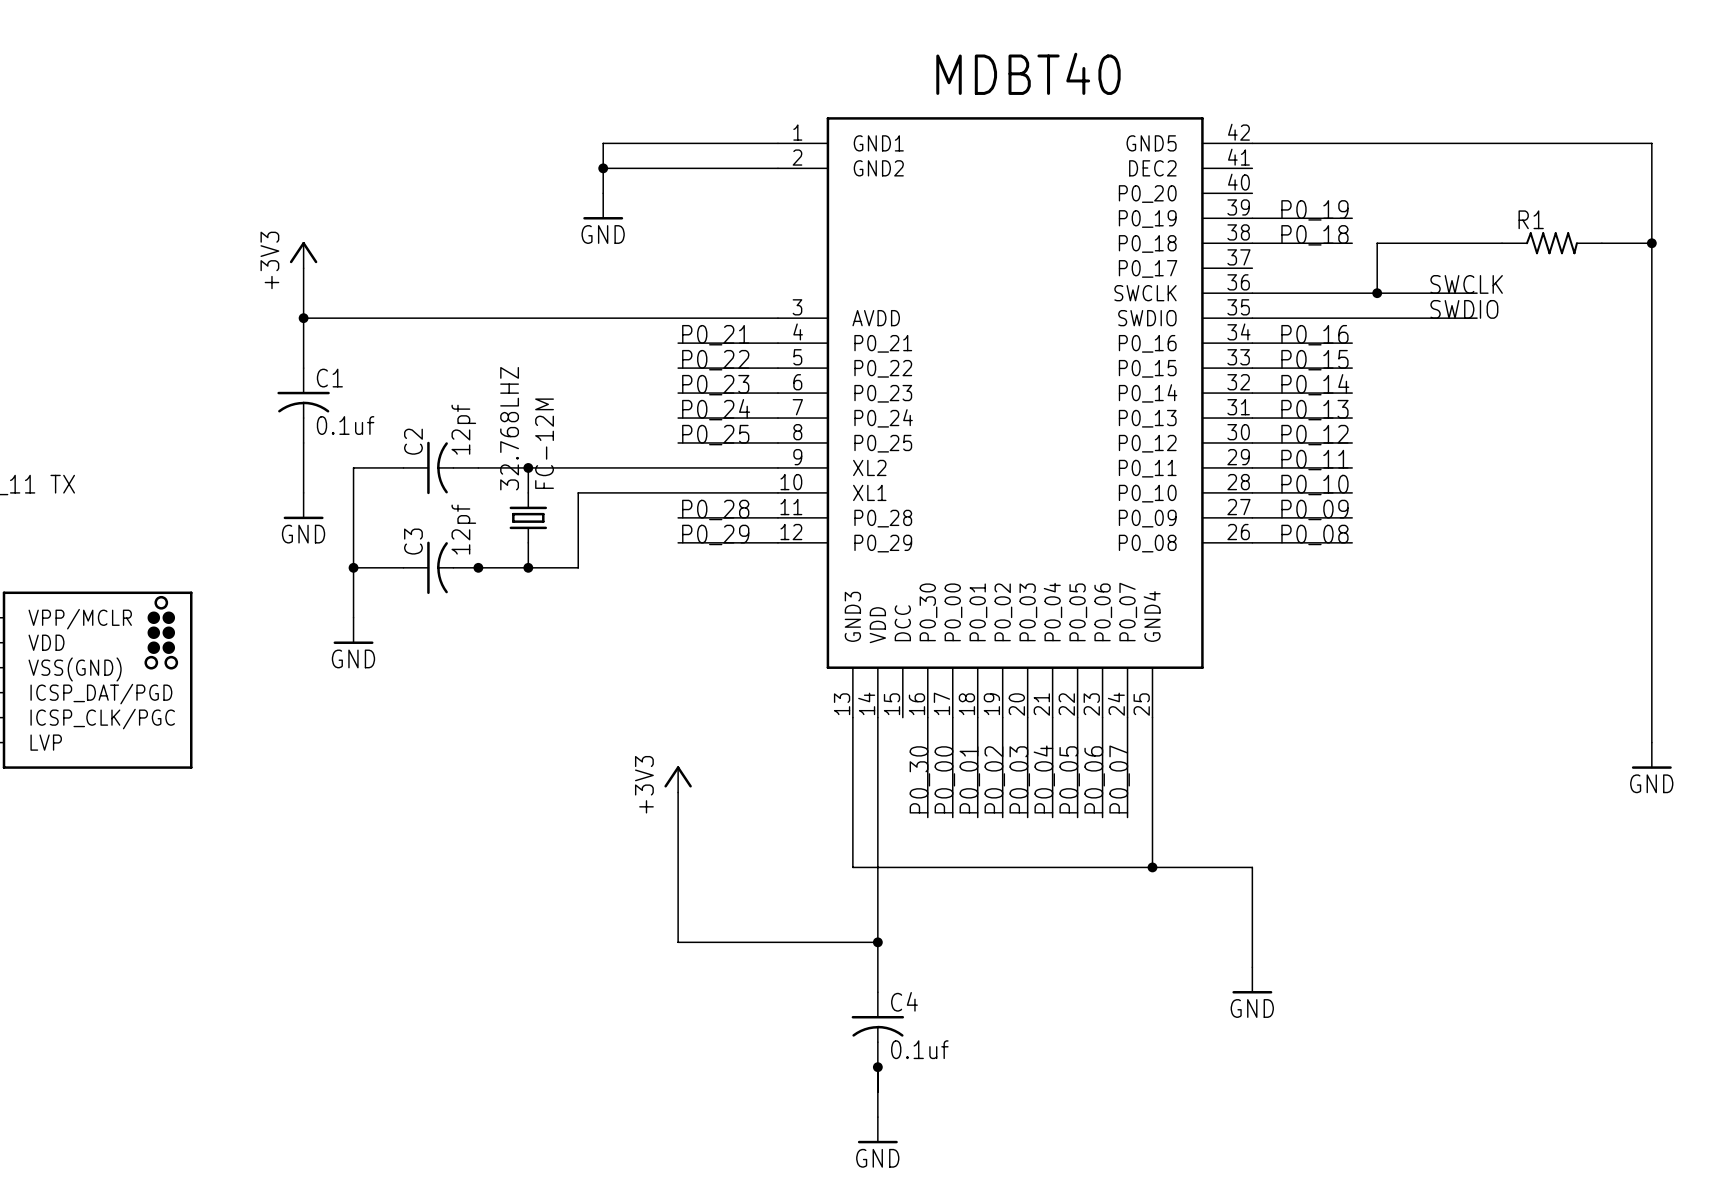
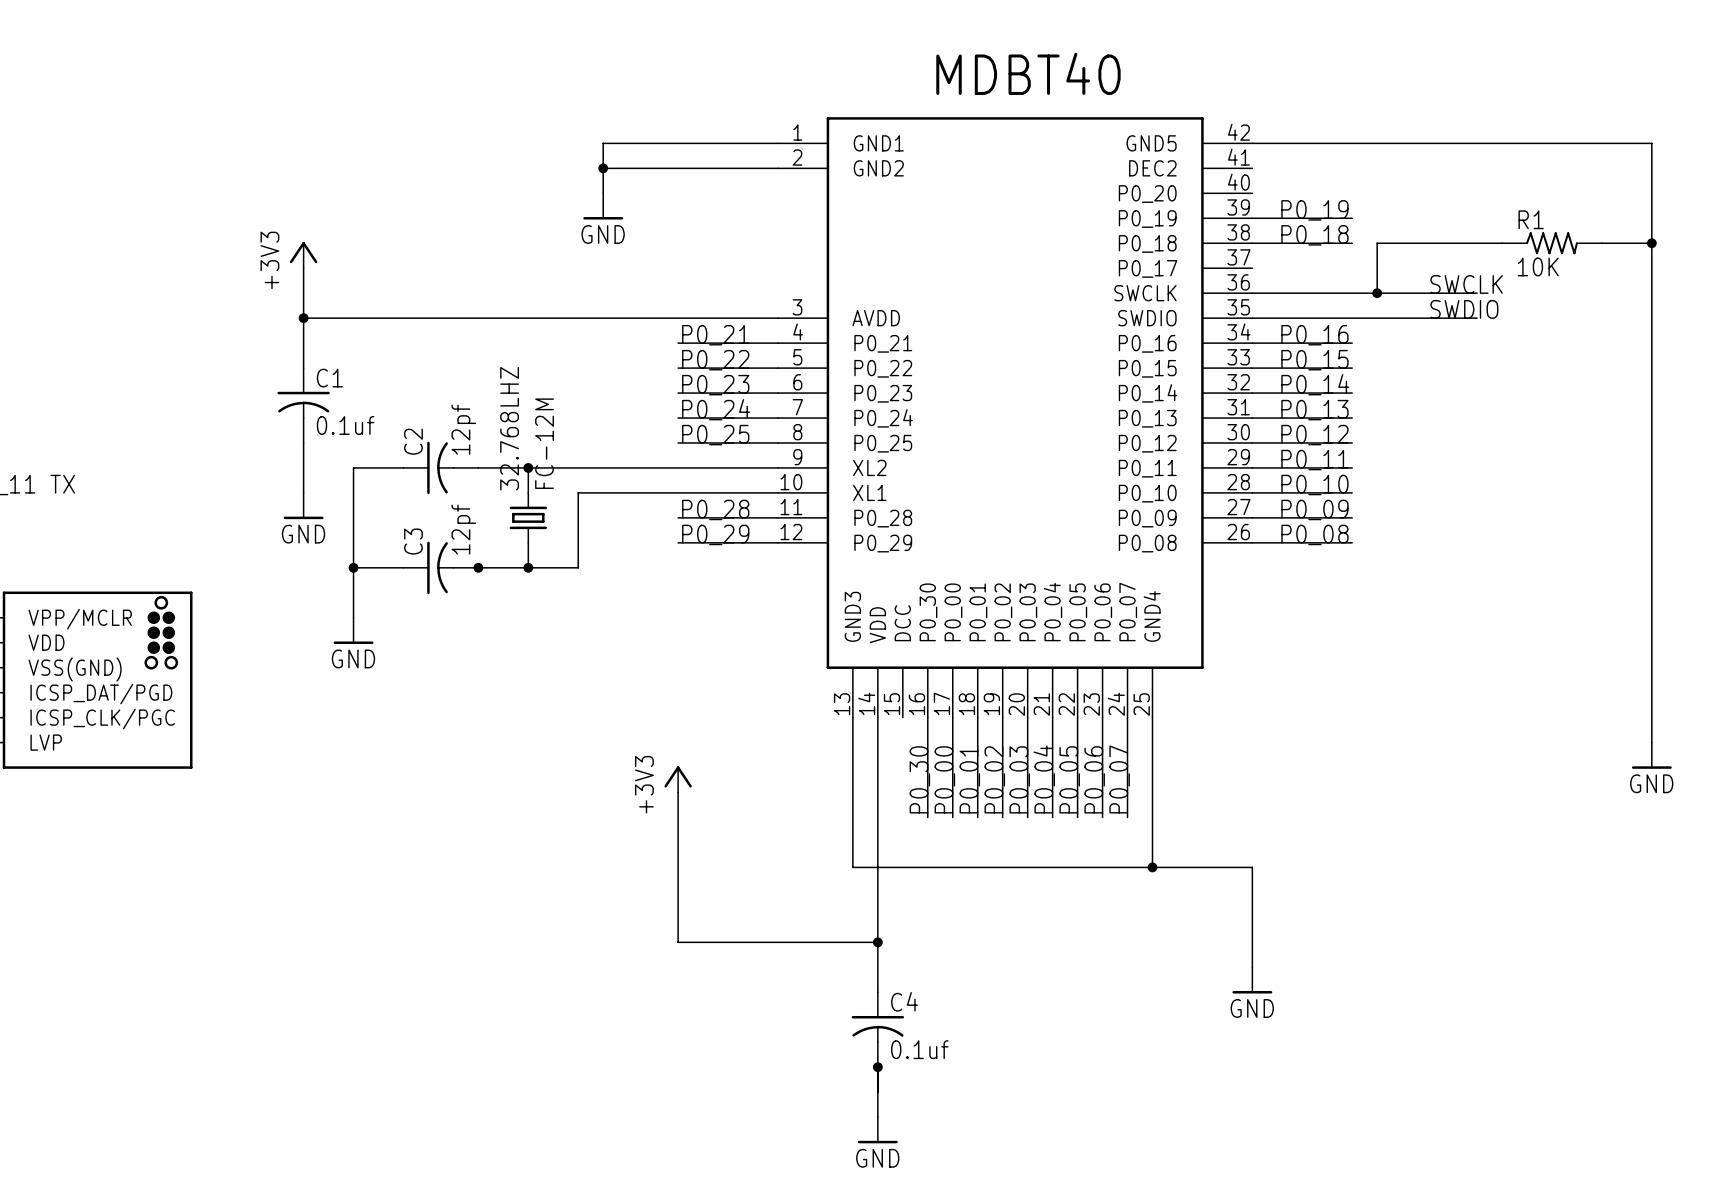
R1 value: none -> 10K (1538, 266)

